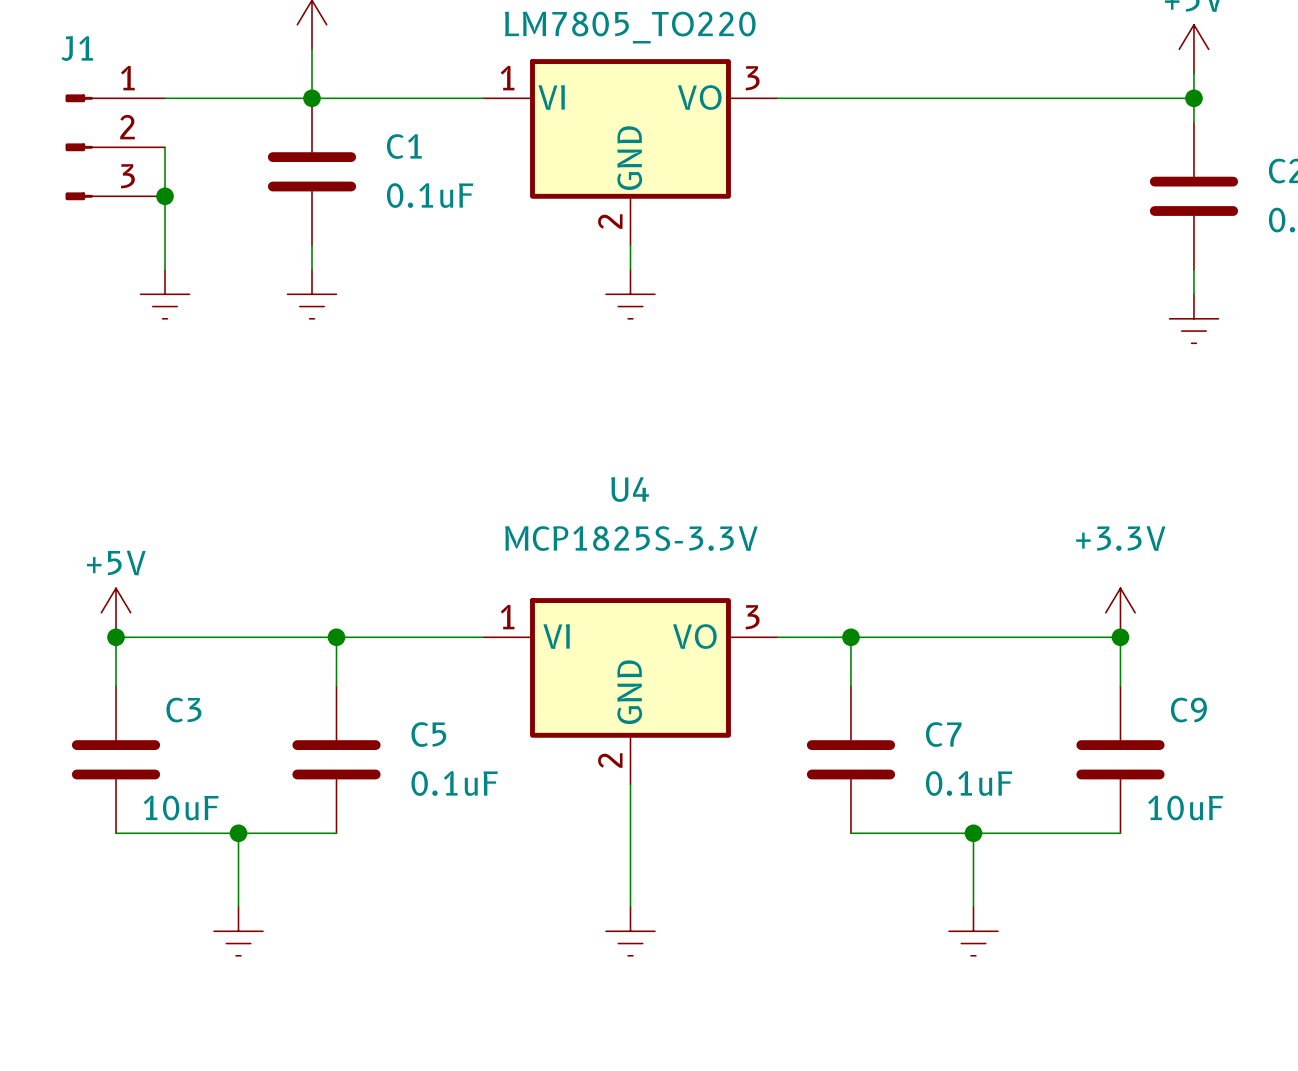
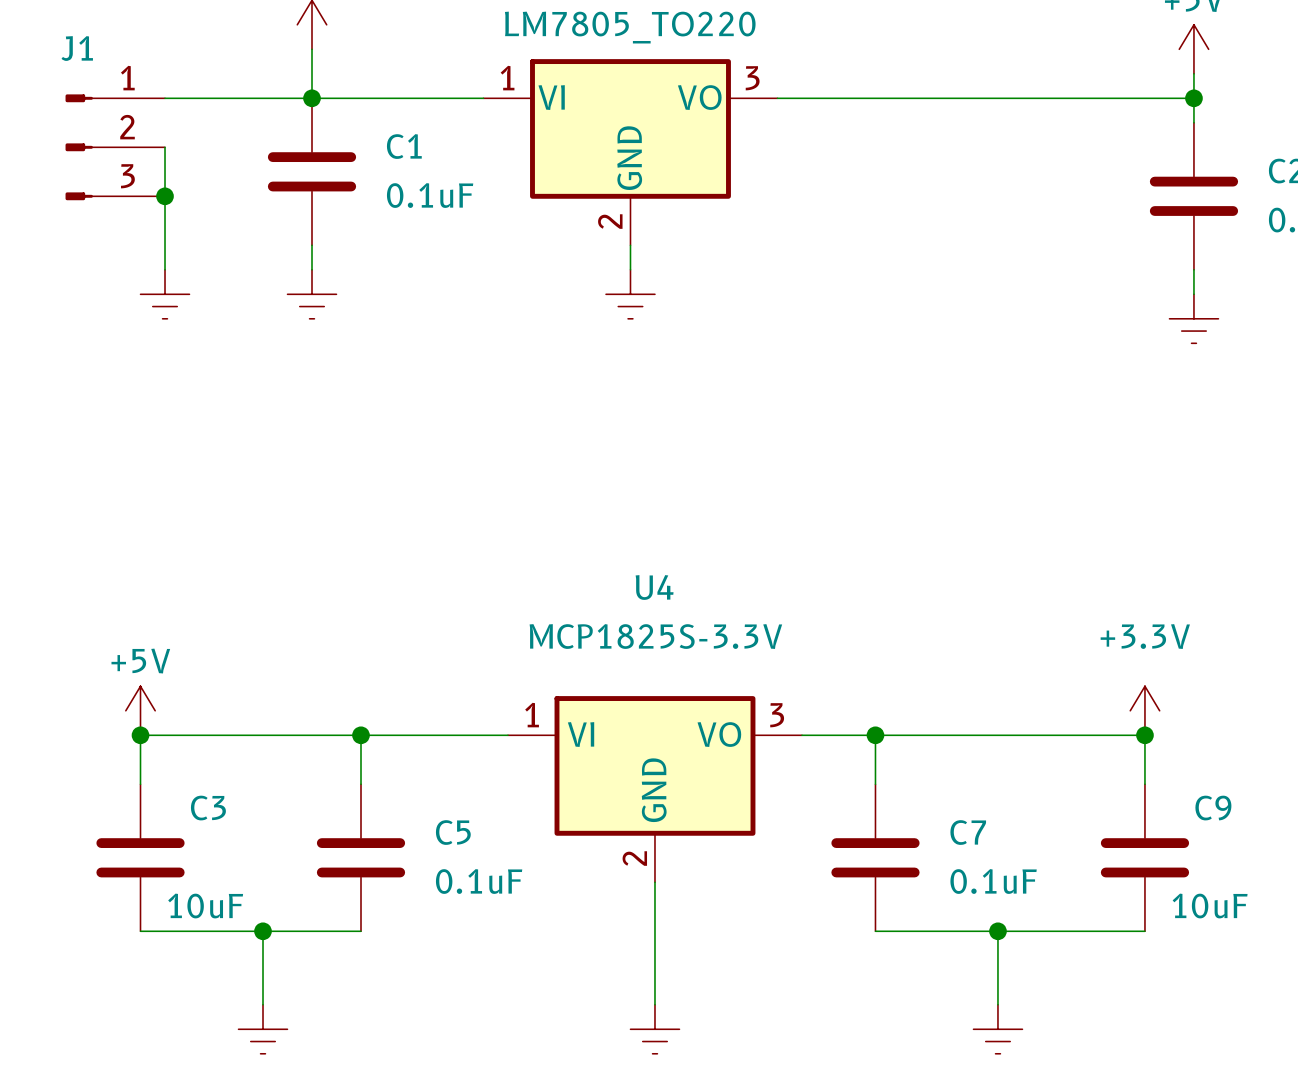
power symbol position: +5V (116, 612) -> +5V (140, 710)
power symbol position: +3.3V (1120, 612) -> +3.3V (1144, 710)
junction: (116, 637) -> none
wire: (336, 637) (336, 686) -> (361, 735) (361, 784)
junction: (336, 637) -> none
wire: (483, 637) (116, 637) (116, 686) -> (507, 735) (140, 735) (140, 784)
wire: (777, 637) (1120, 637) (1120, 686) -> (801, 735) (1144, 735) (1144, 784)
wire: (850, 637) (850, 686) -> (875, 735) (875, 784)
junction: (850, 637) -> none
junction: (1120, 637) -> none
U4 position: (630, 691) -> (654, 789)
junction: none -> (140, 735)
junction: none -> (361, 735)
junction: none -> (875, 735)
junction: none -> (1144, 735)
C3 position: (116, 759) -> (140, 857)
C5 position: (336, 759) -> (361, 857)
C7 position: (850, 759) -> (875, 857)
C9 position: (1120, 759) -> (1144, 857)
wire: (630, 784) (630, 906) -> (654, 882) (654, 1004)
wire: (116, 833) (336, 833) -> (140, 931) (361, 931)
wire: (238, 833) (238, 906) -> (263, 931) (263, 1004)
junction: (238, 833) -> none
wire: (850, 833) (1120, 833) -> (875, 931) (1144, 931)
wire: (973, 833) (973, 906) -> (997, 931) (997, 1004)
junction: (973, 833) -> none
power symbol position: (238, 931) -> (263, 1029)
junction: none -> (263, 931)
power symbol position: (630, 931) -> (654, 1029)
power symbol position: (973, 931) -> (997, 1029)
junction: none -> (997, 931)

